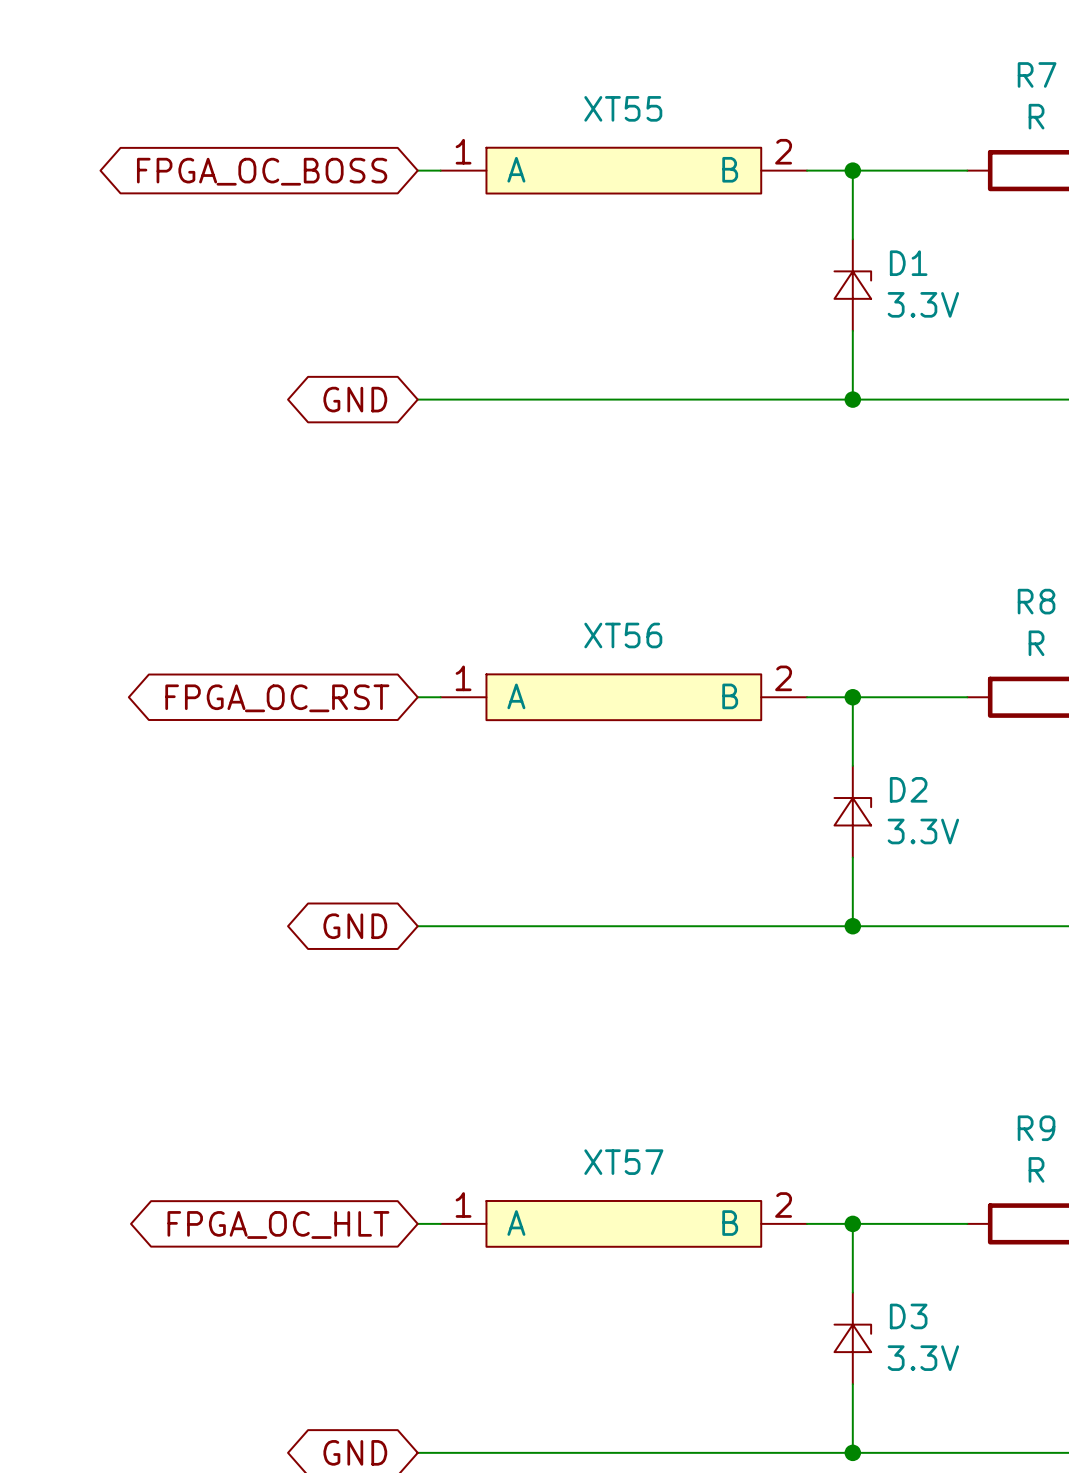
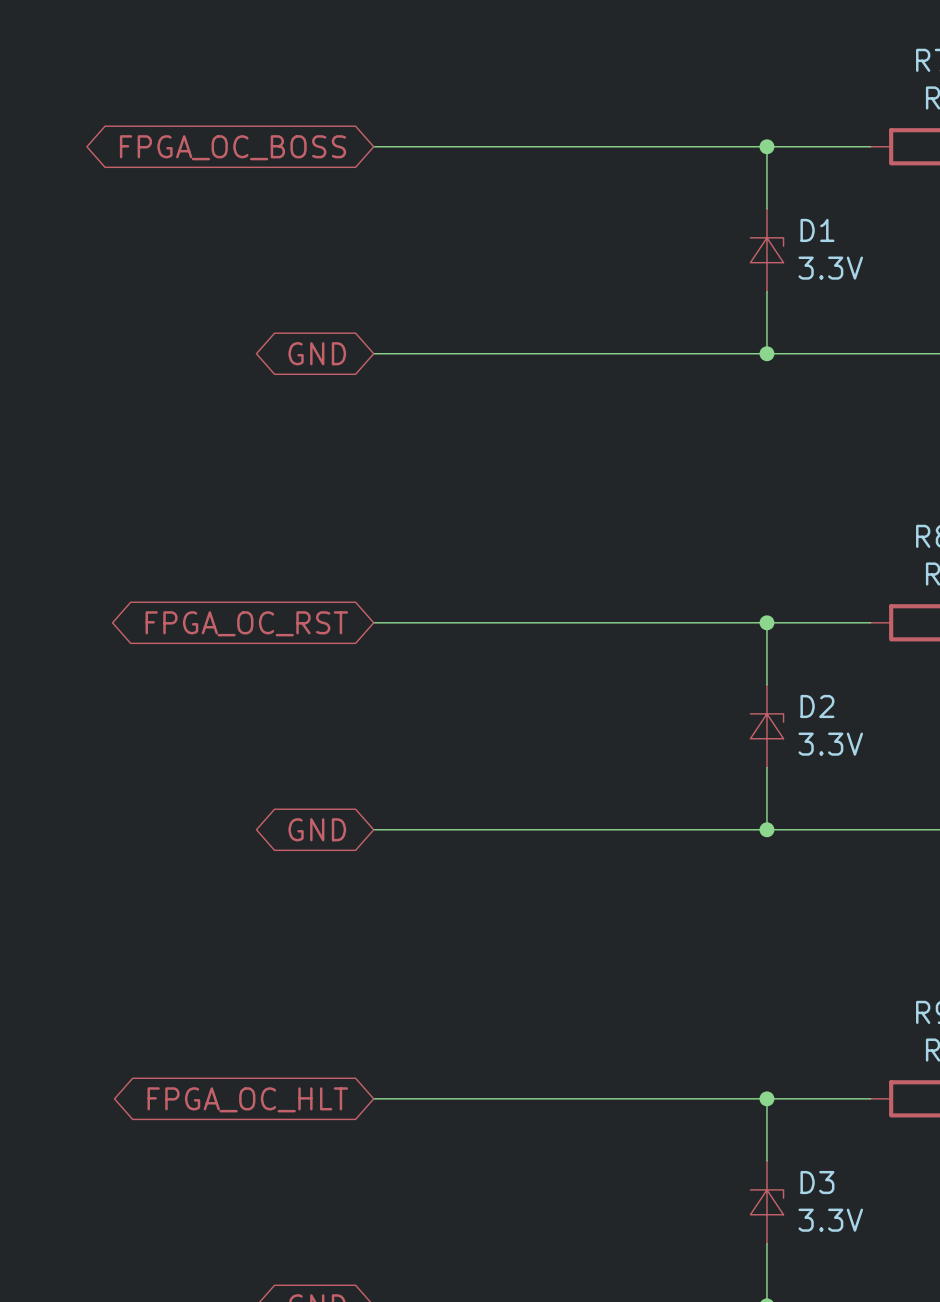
XT55: (623, 170) -> none
XT56: (623, 697) -> none
XT57: (623, 1223) -> none

